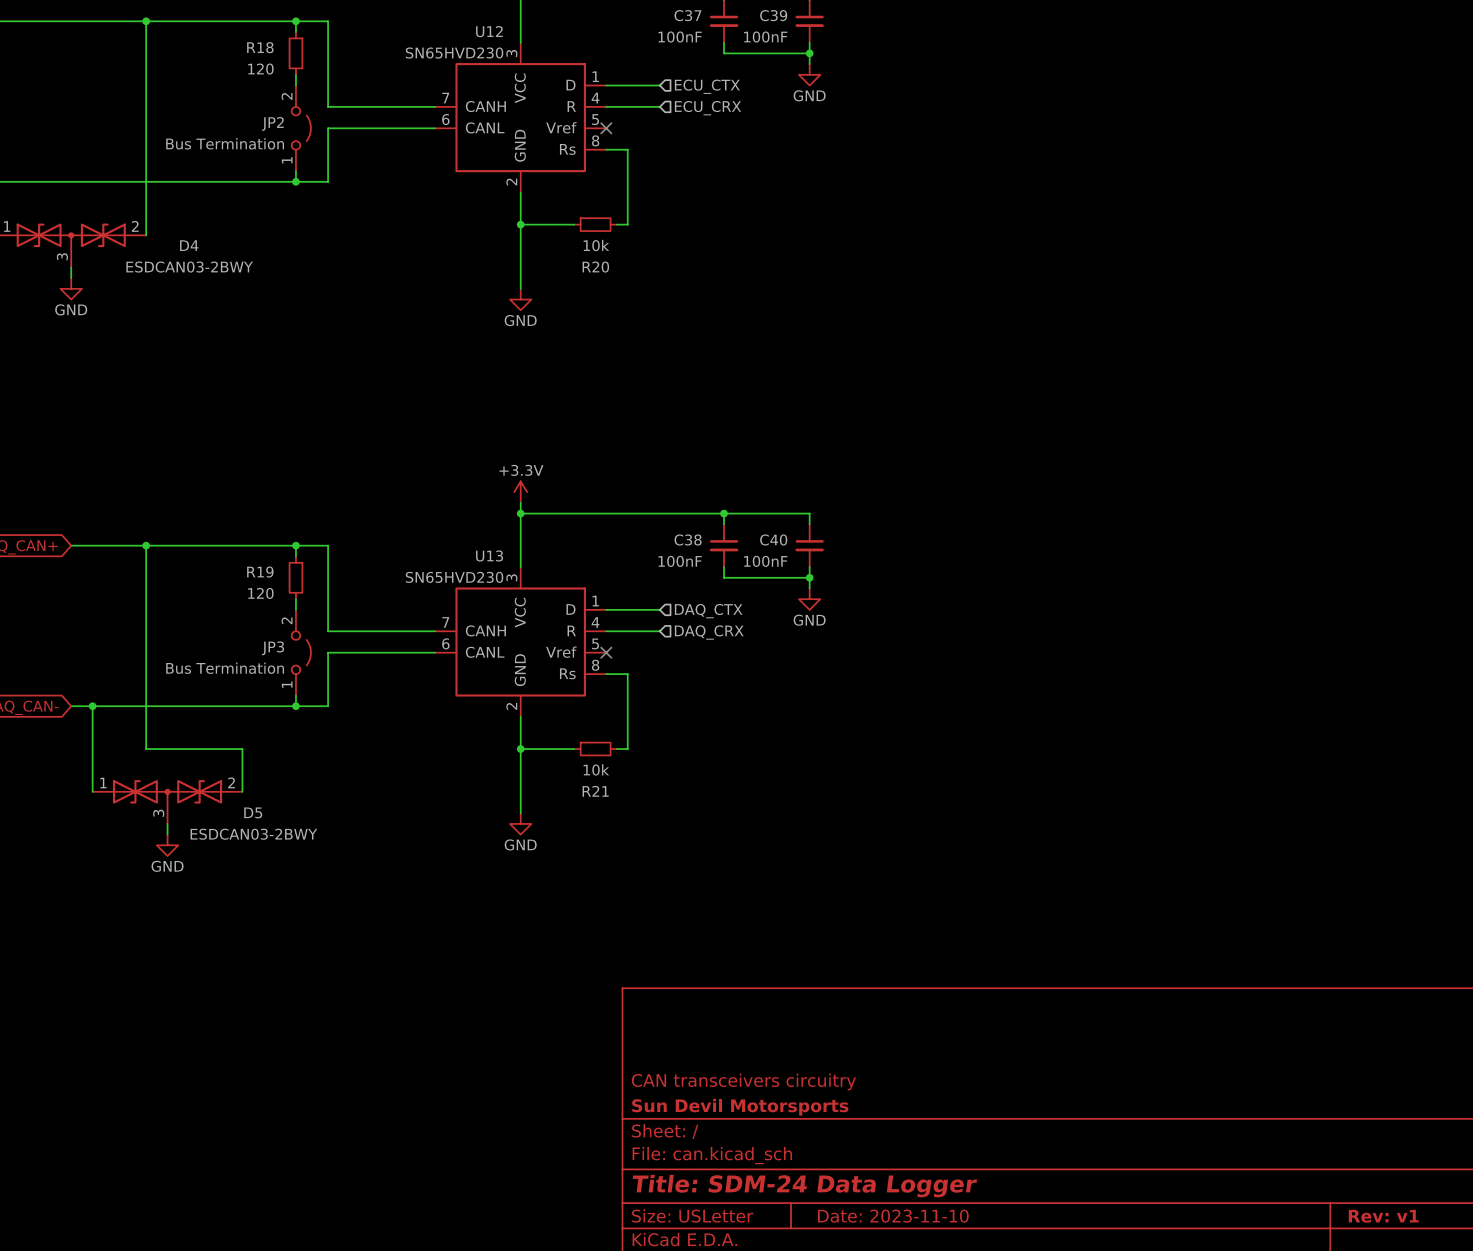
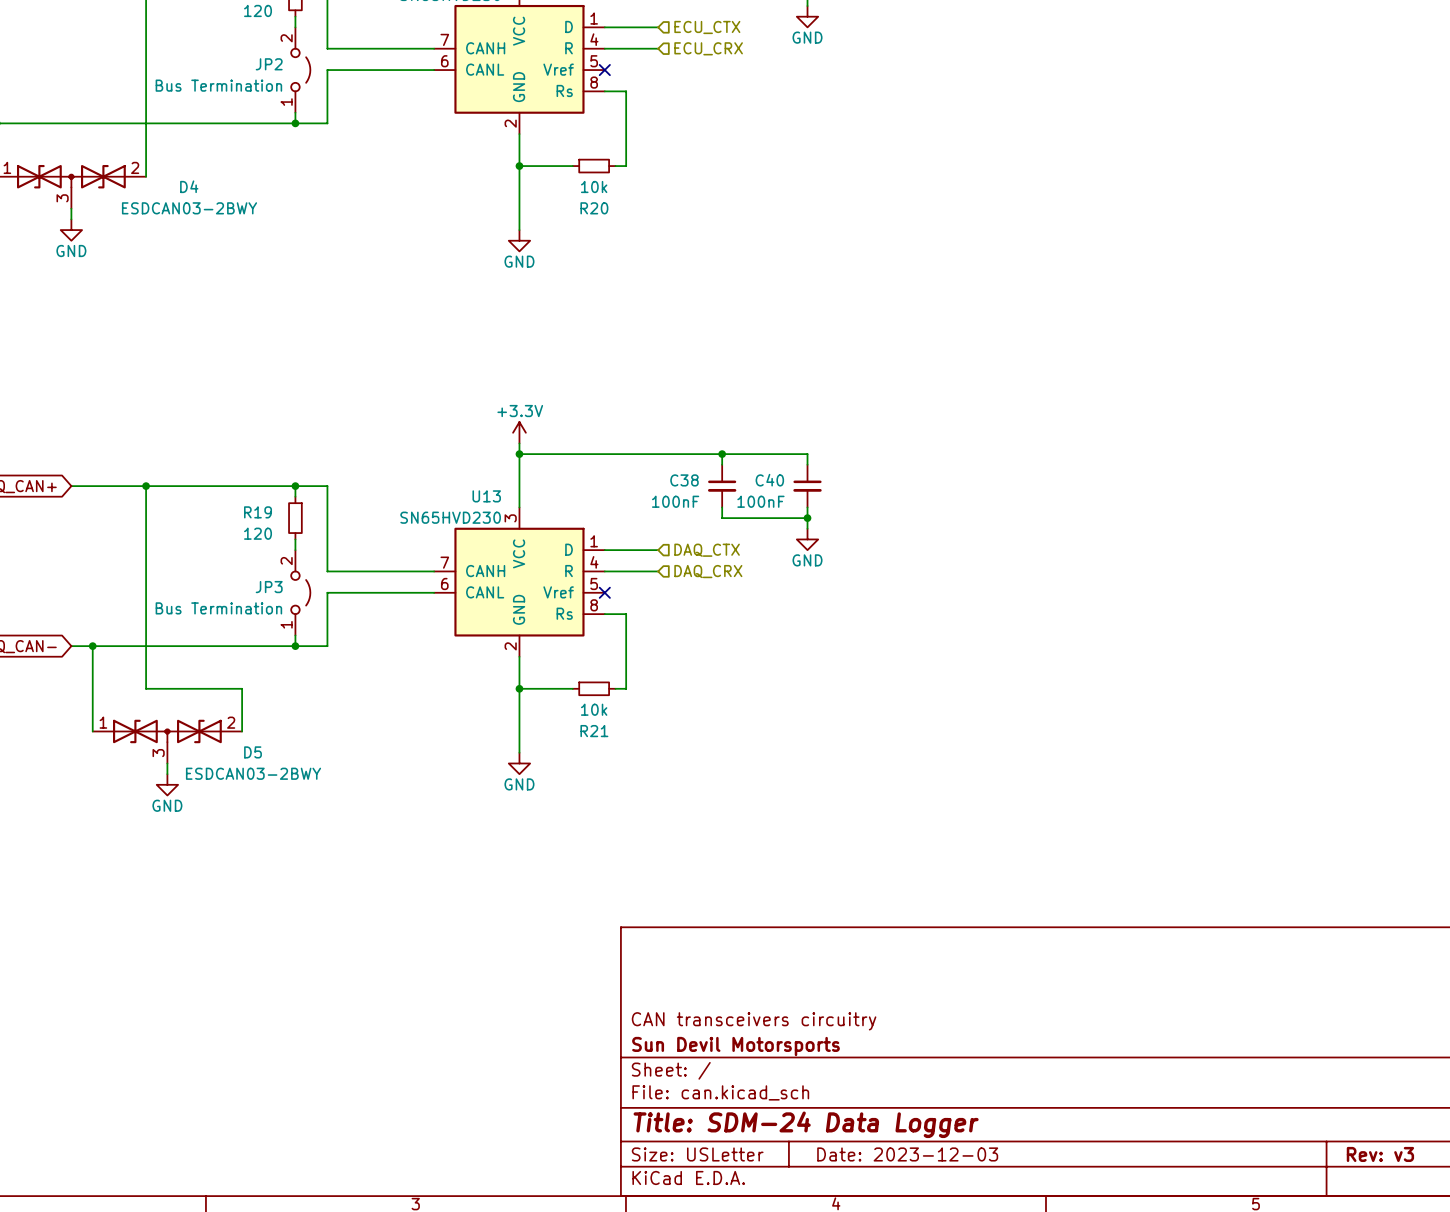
title block: Date: 2023-11-10 (893, 1216) -> Date: 2023-12-03 (907, 1154)
title block: Rev: v1 (1383, 1216) -> Rev: v3 (1380, 1154)

